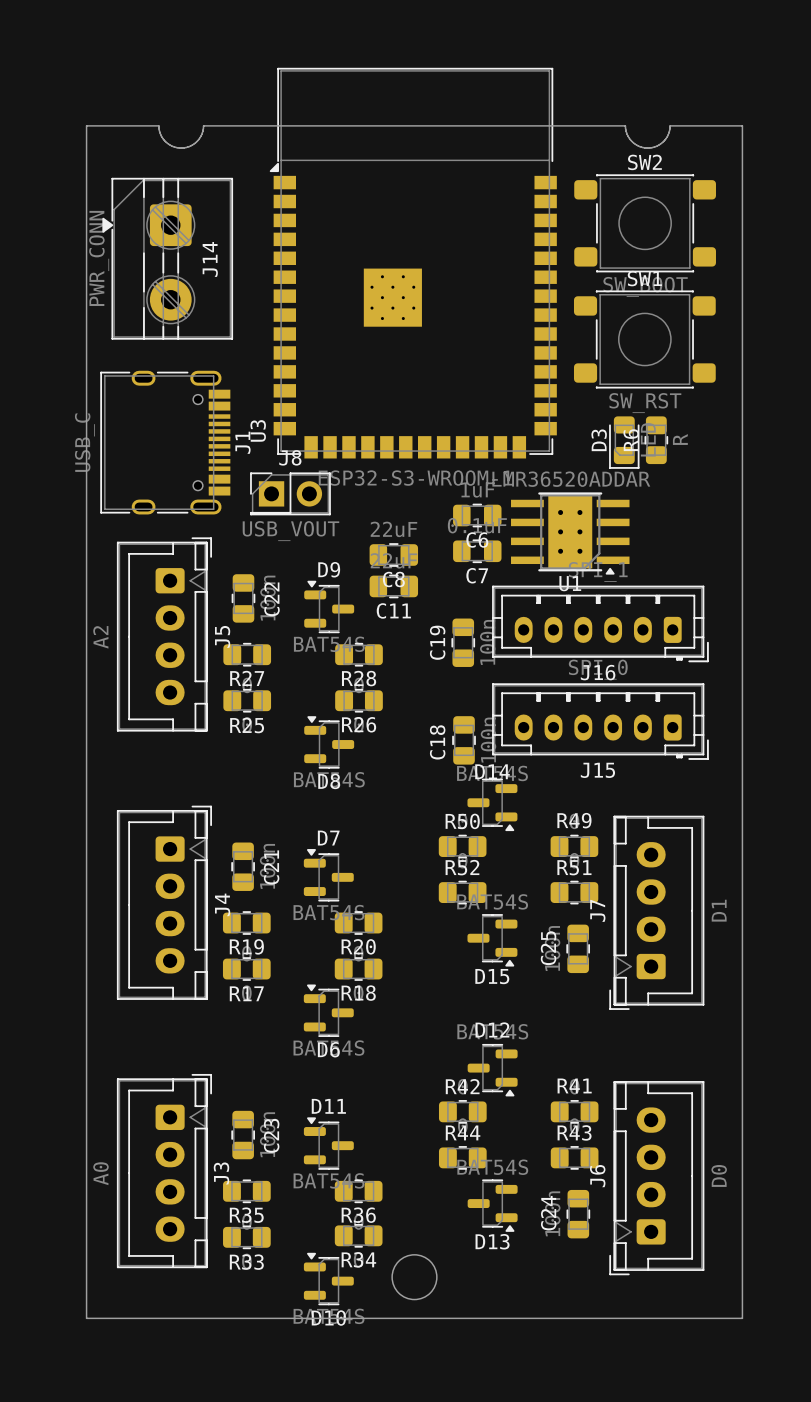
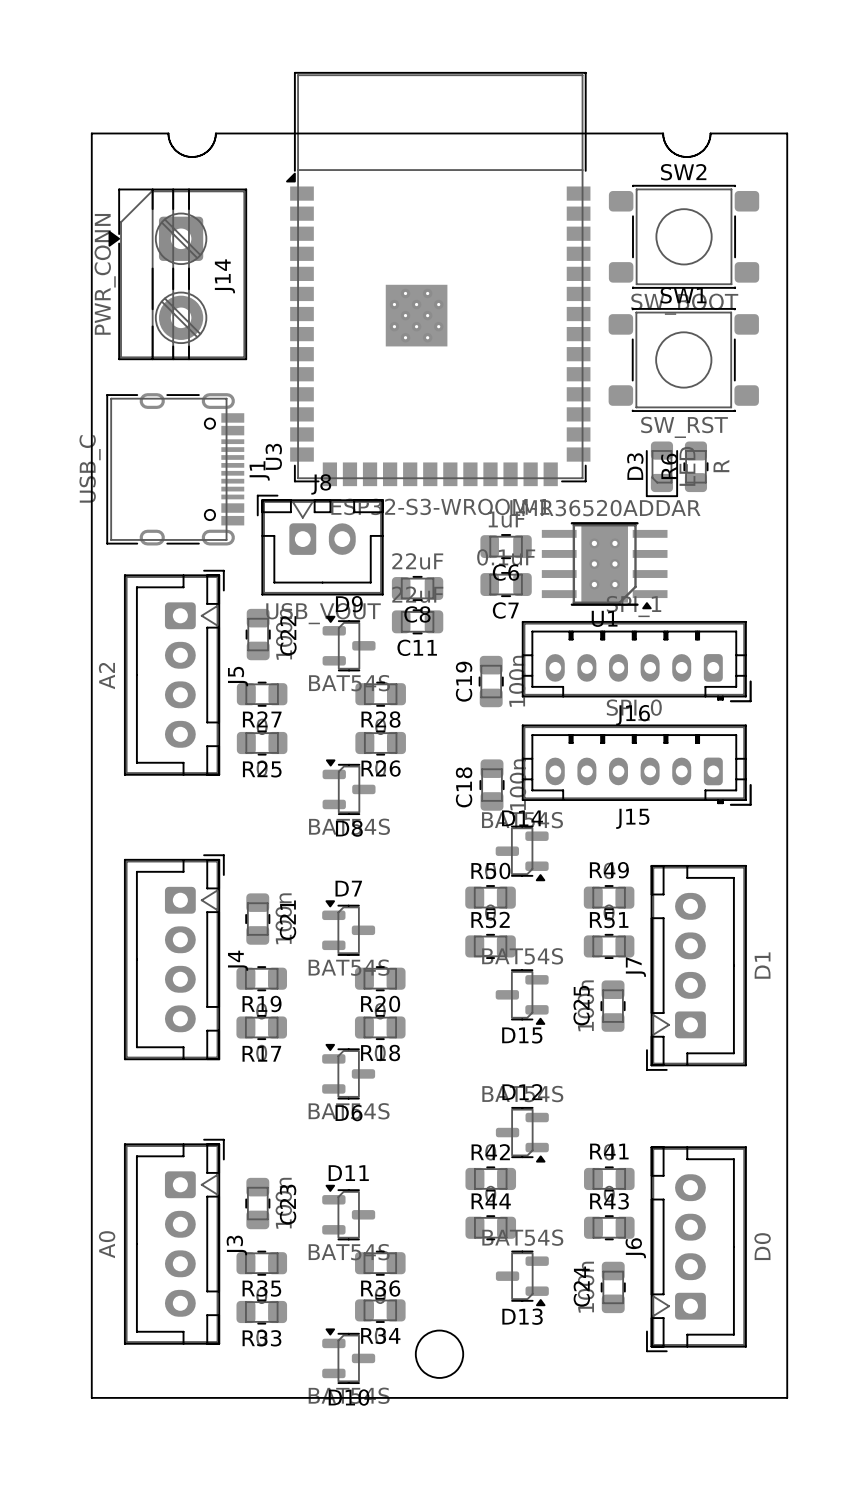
J8 footprint: [250, 472, 331, 516] -> [256, 494, 384, 596]

